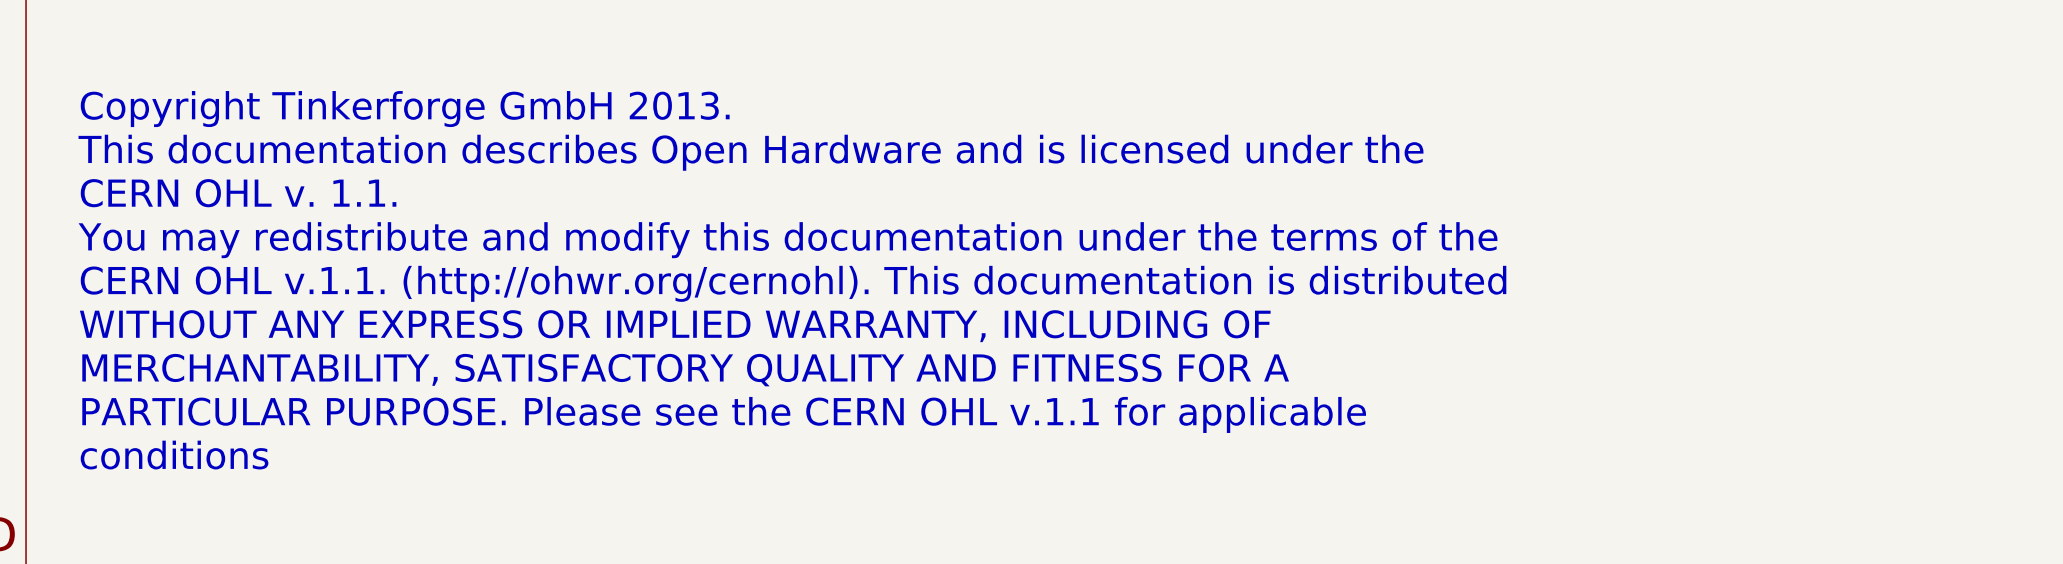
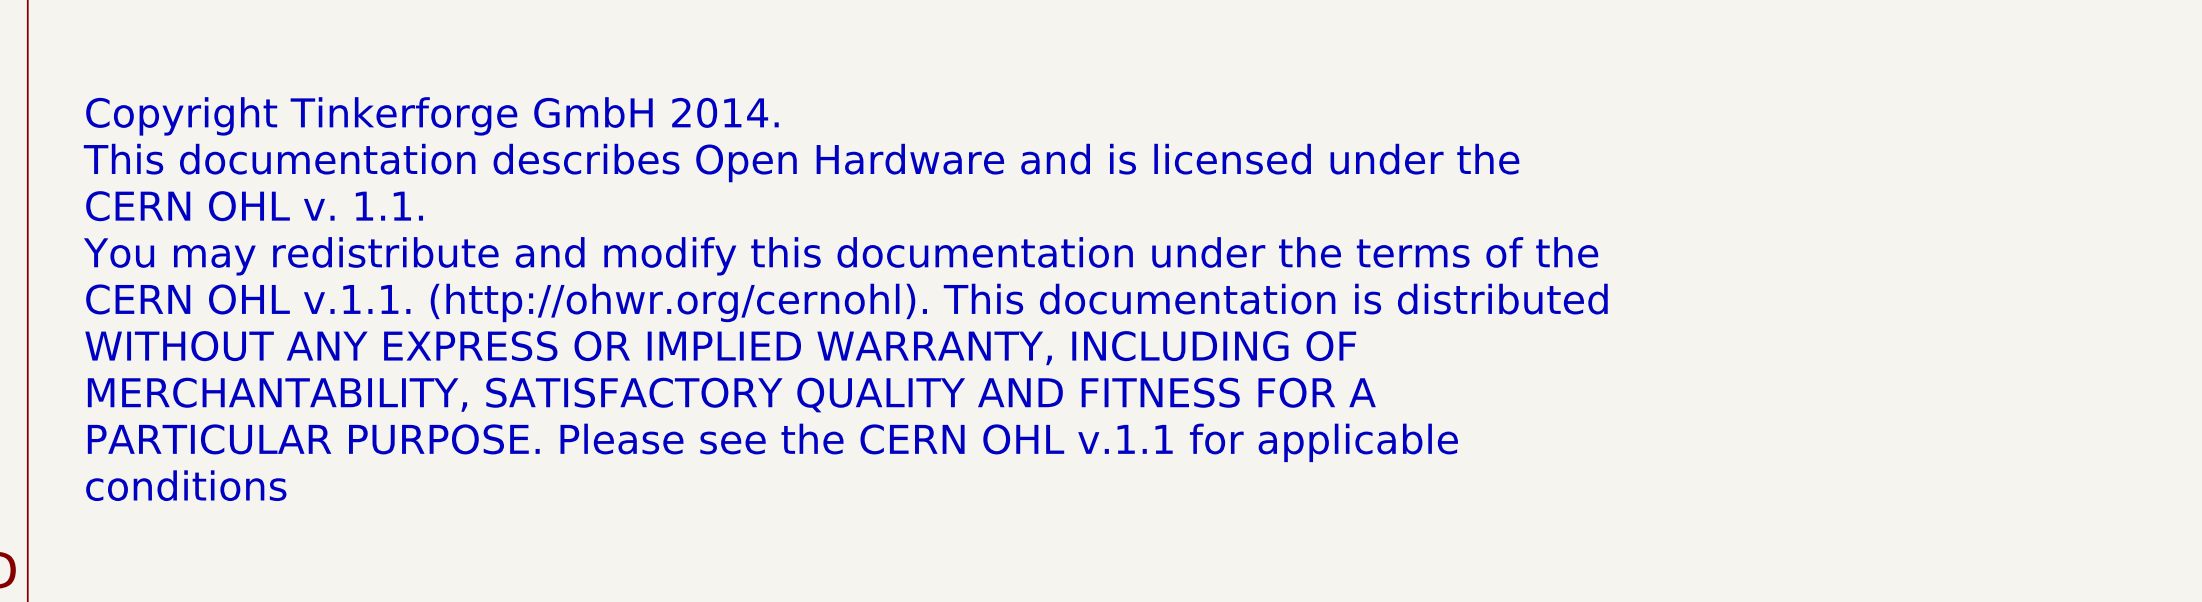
text: Copyright Tinkerforge GmbH 2013. (405, 109) -> Copyright Tinkerforge GmbH 2014. (432, 116)

